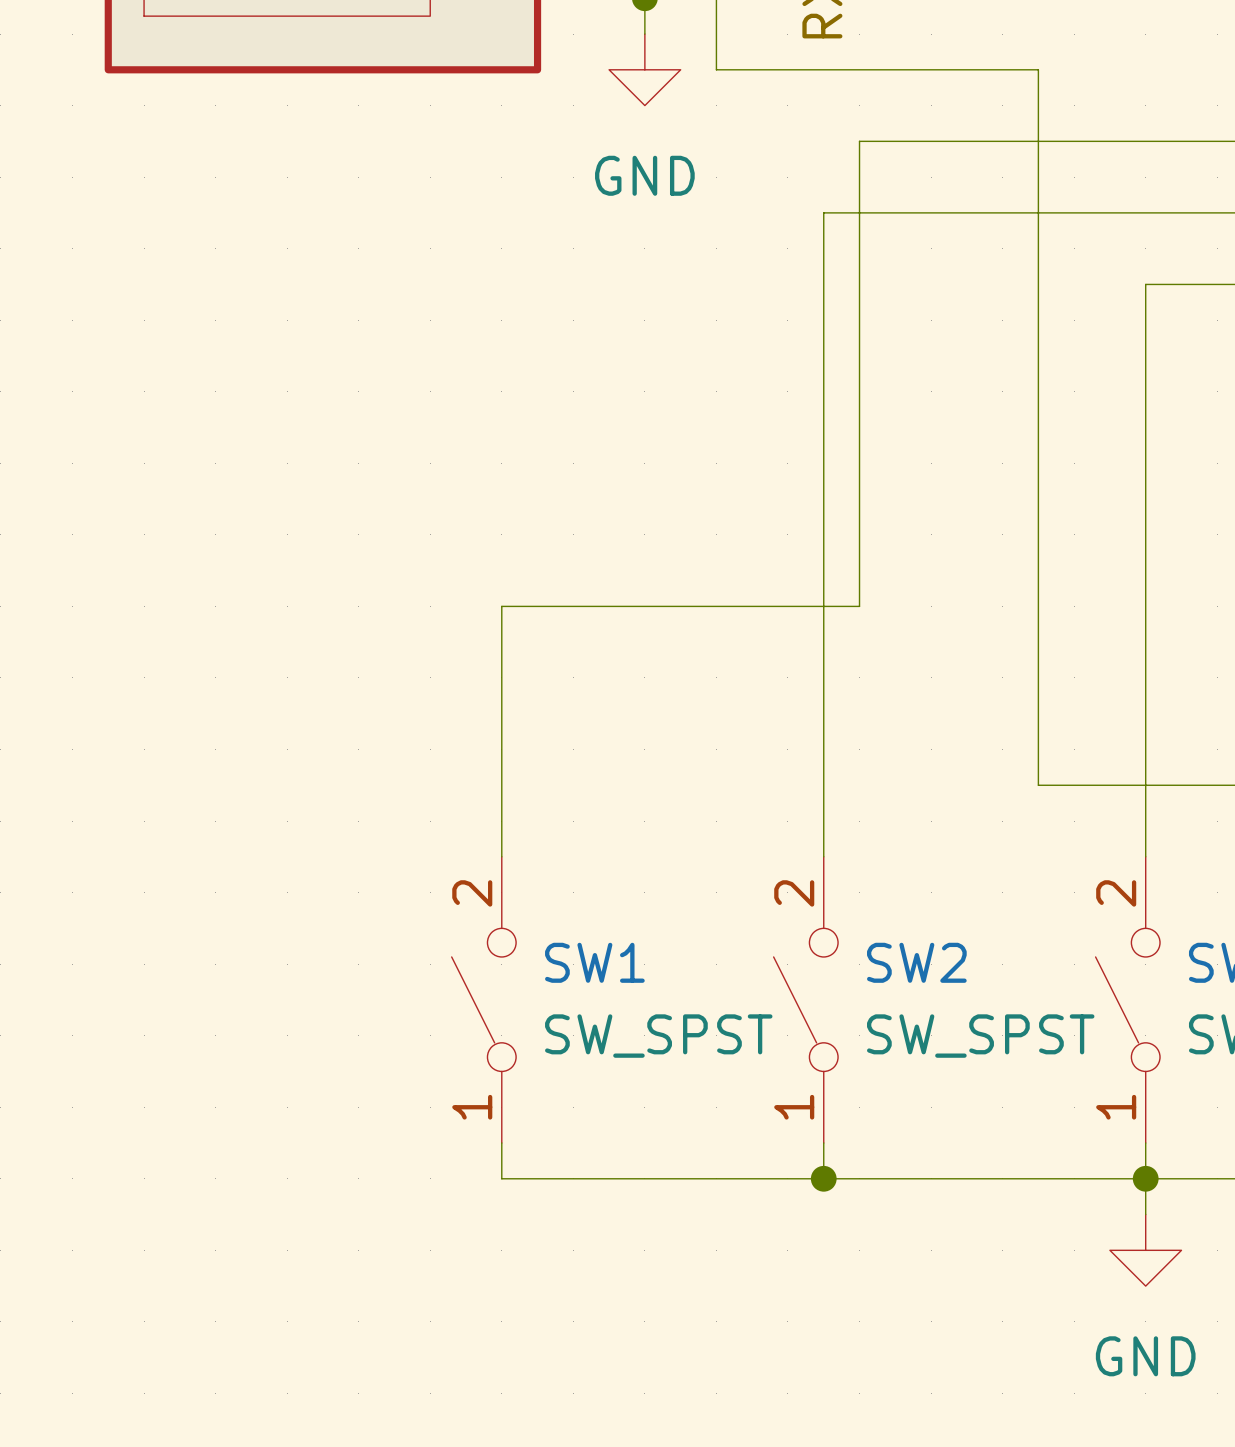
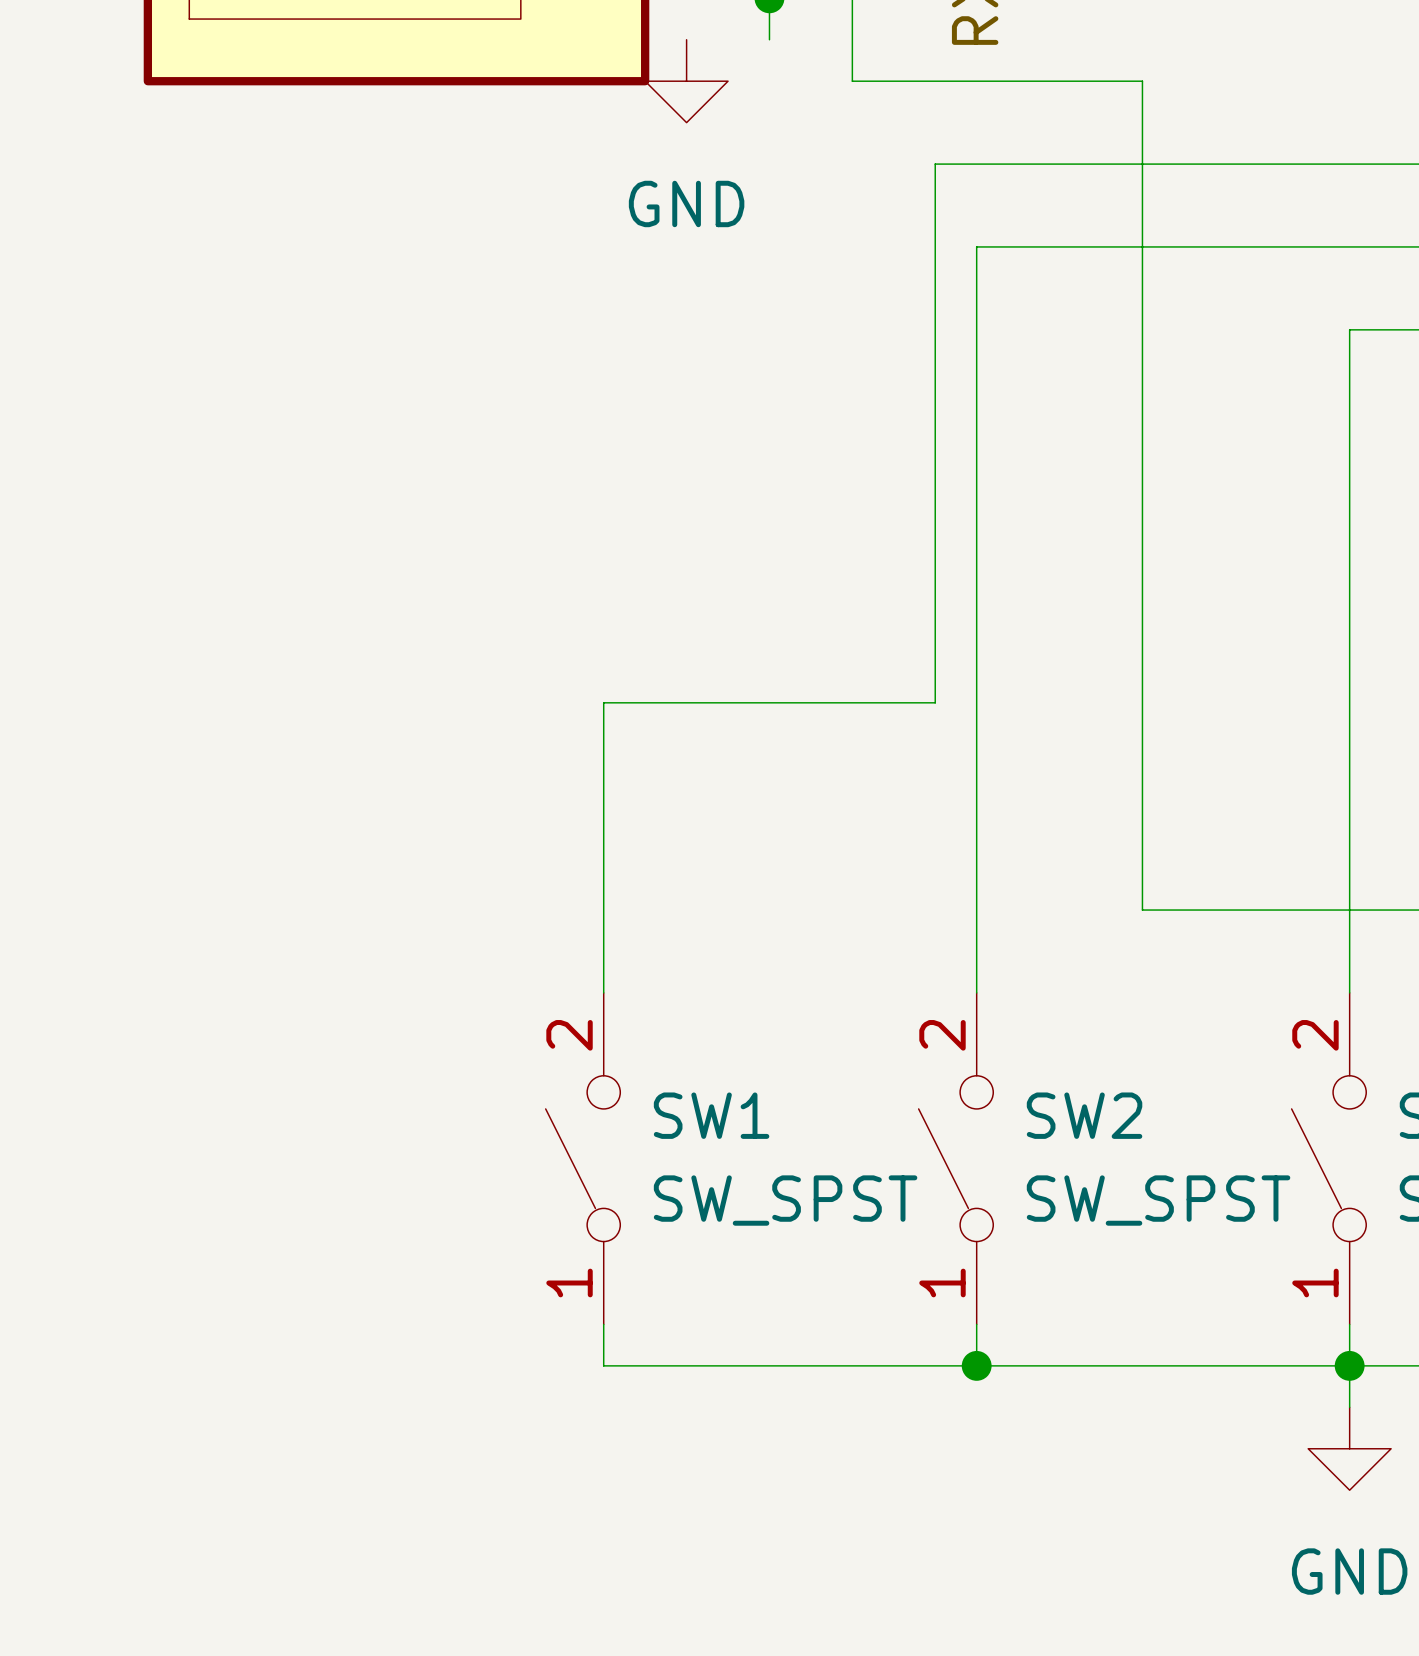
power symbol position: GND (644, 69) -> GND (686, 81)
wire: (966, 69) (1038, 69) (1038, 785) -> (1142, 81) (1142, 910) (1225, 910)
wire: (859, 141) (859, 606) (787, 606) -> (1018, 164) (935, 164) (935, 702)

